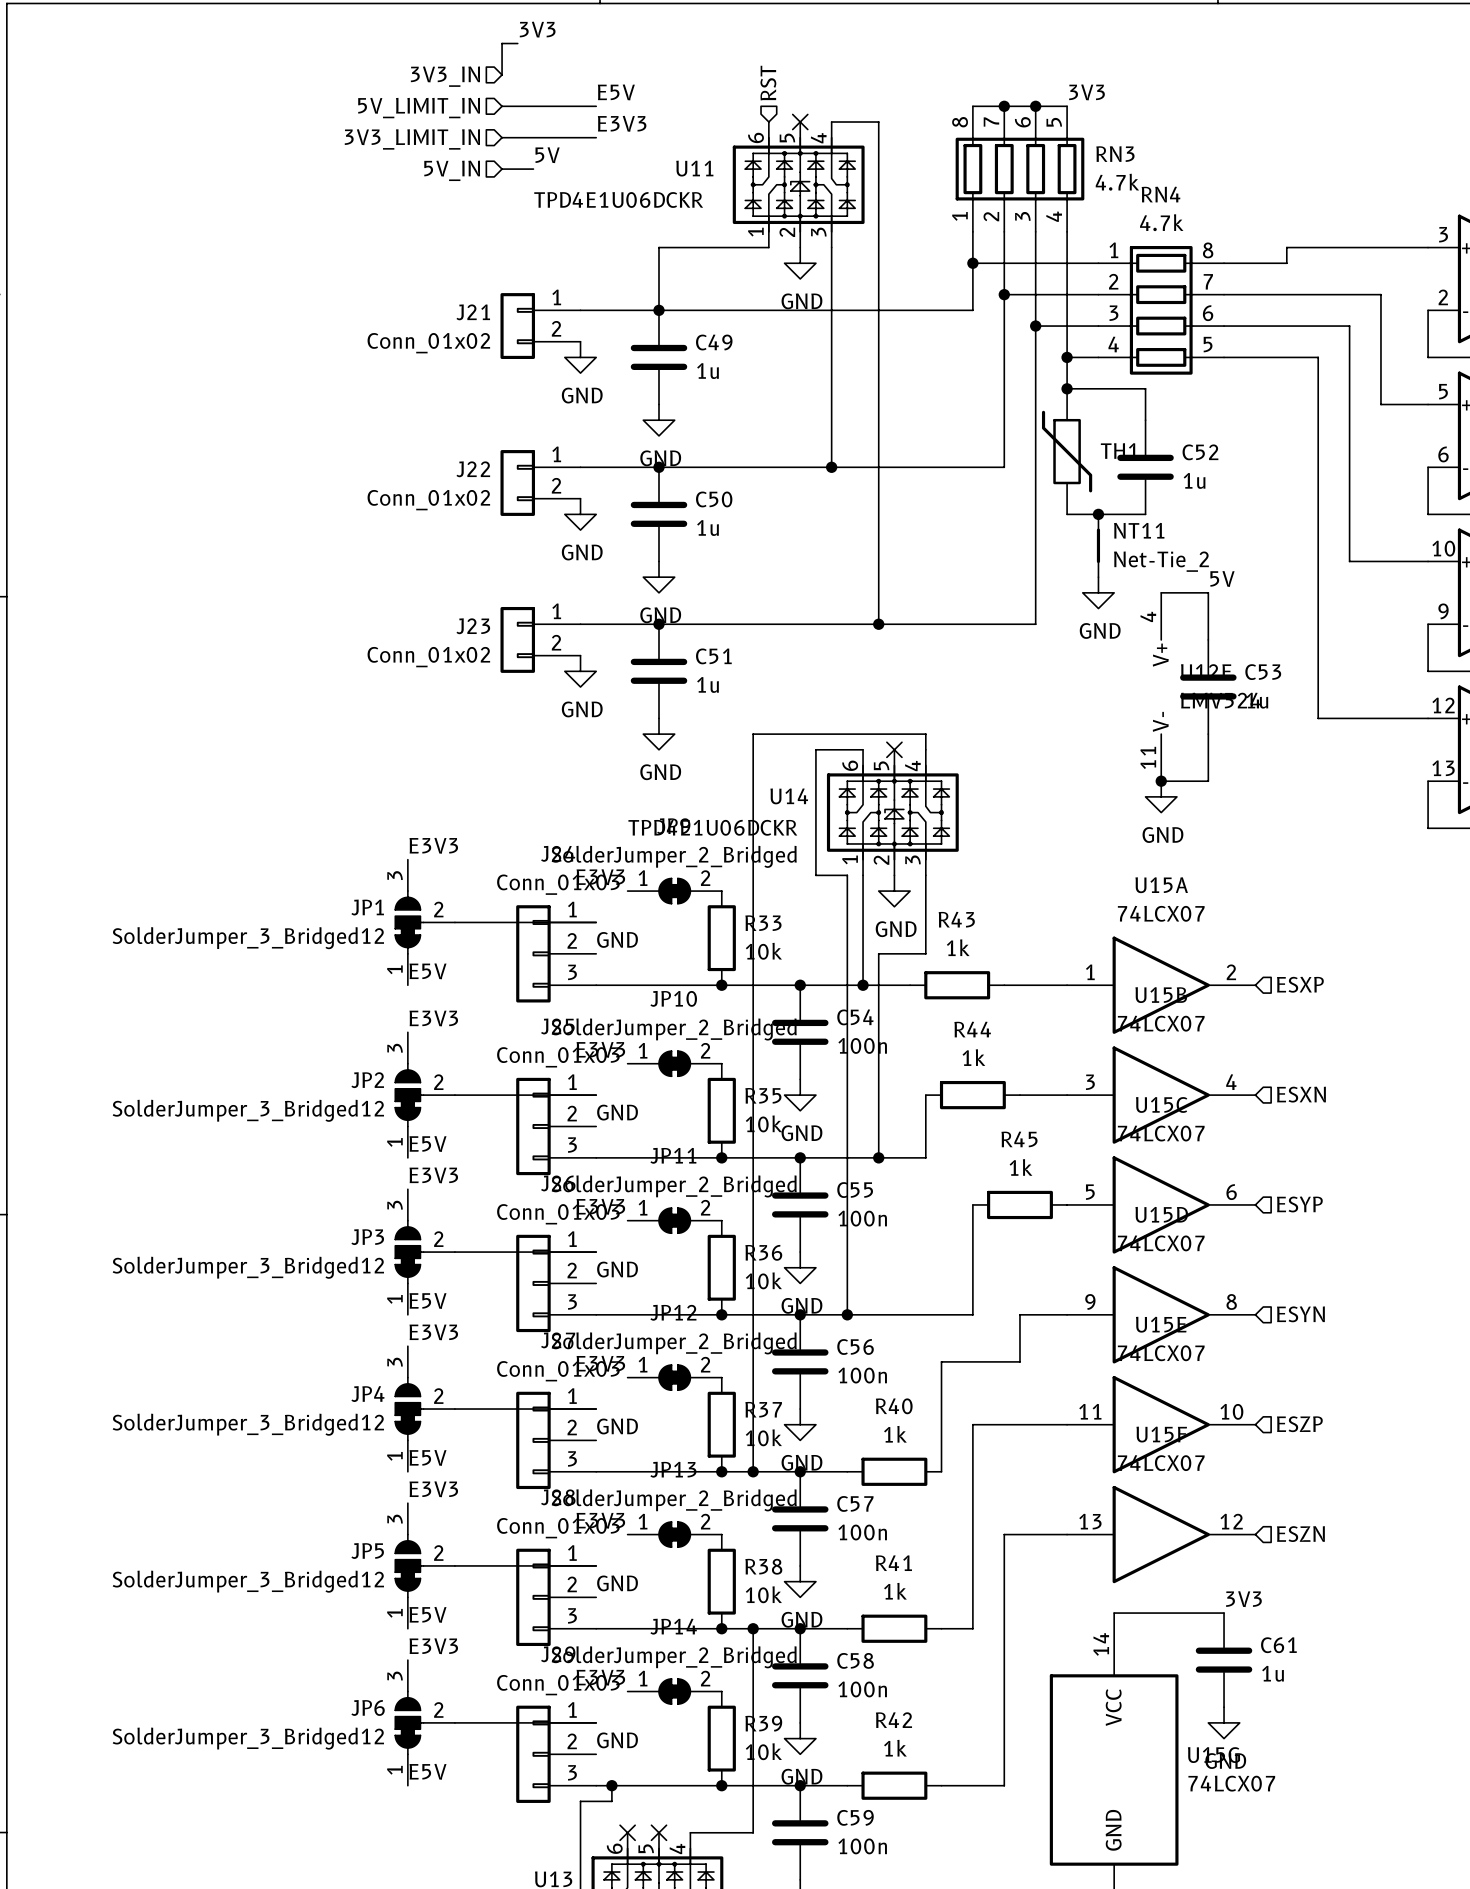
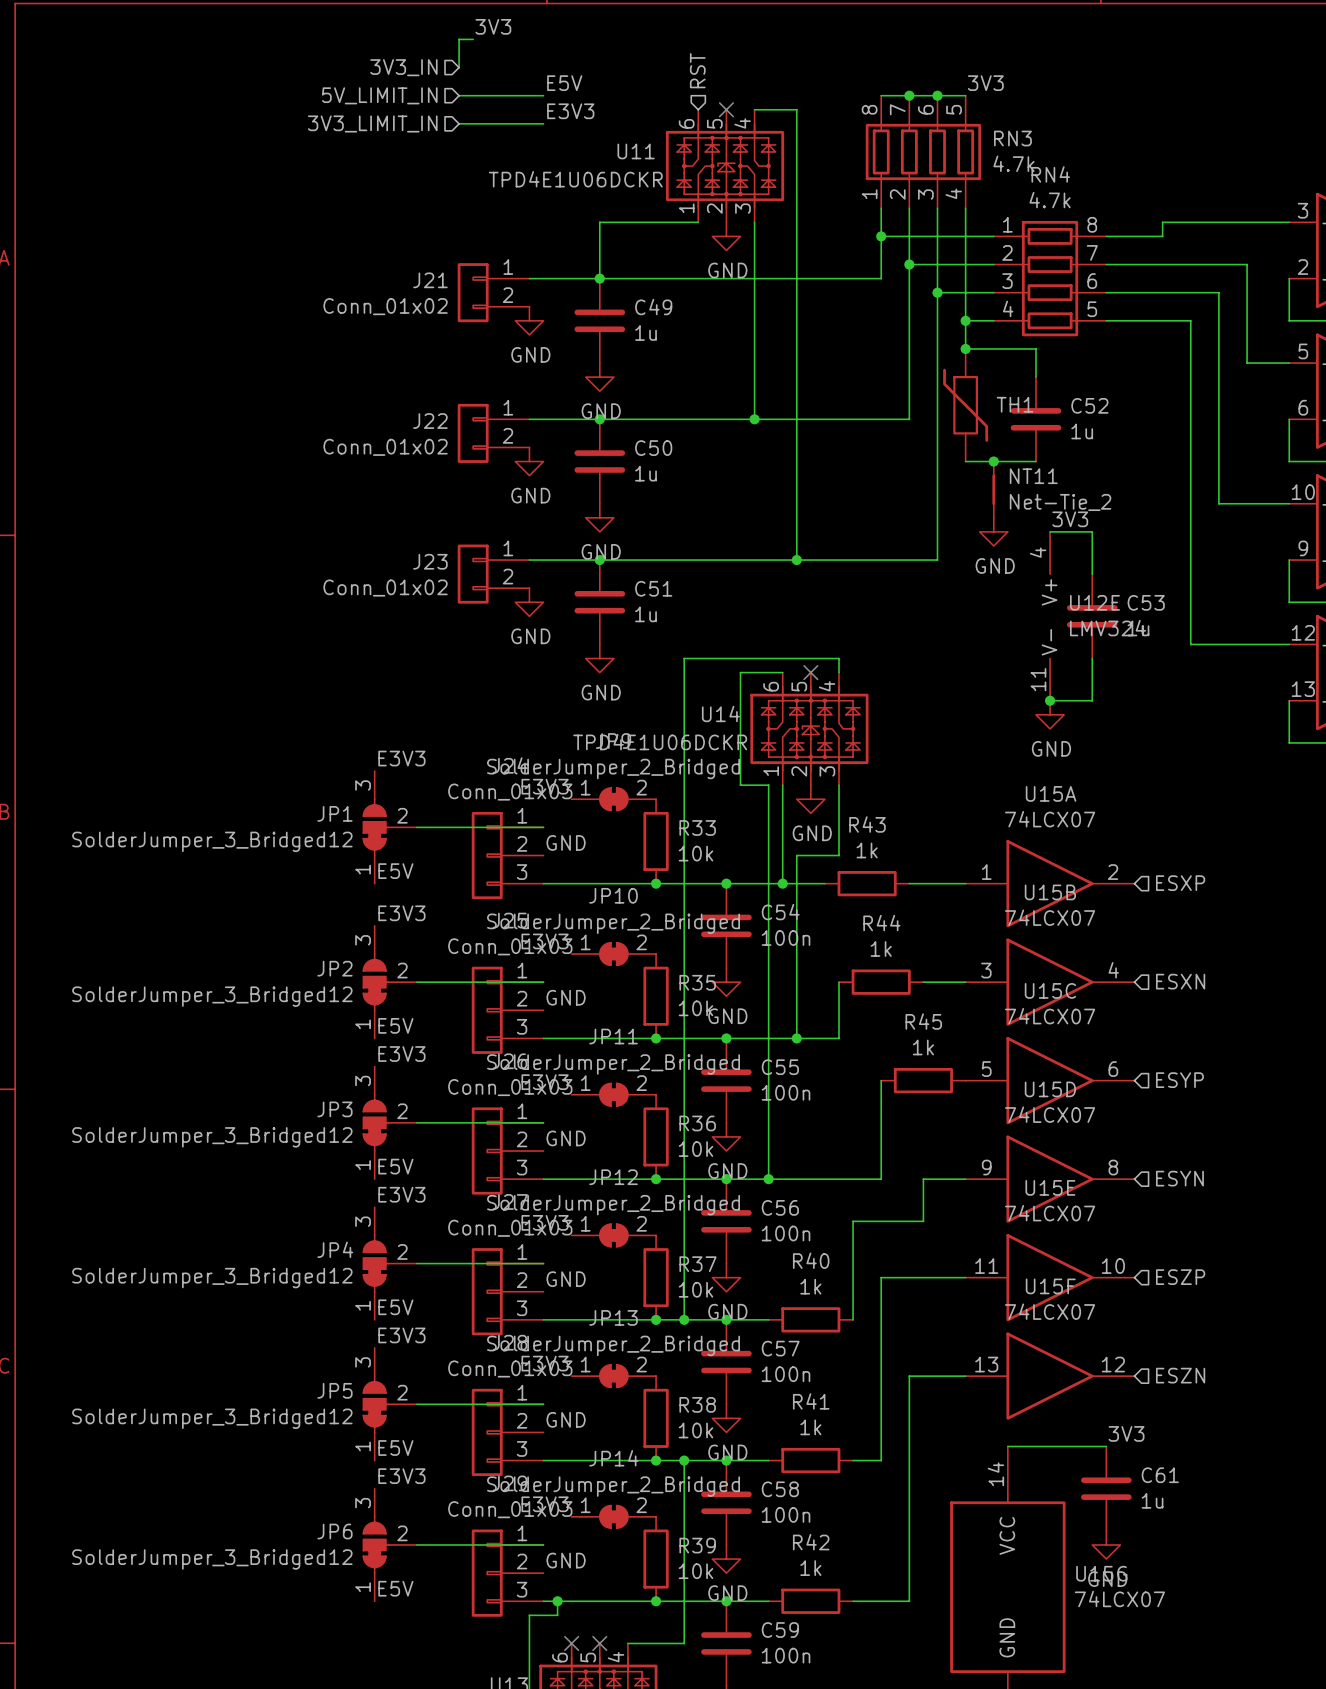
label: 5V (547, 155) -> none
wire: (502, 169) (533, 169) -> none
hierarchical label: 5V_IN (452, 170) -> none
label: none -> 3V3 (1070, 519)
label: 5V (1222, 578) -> none

